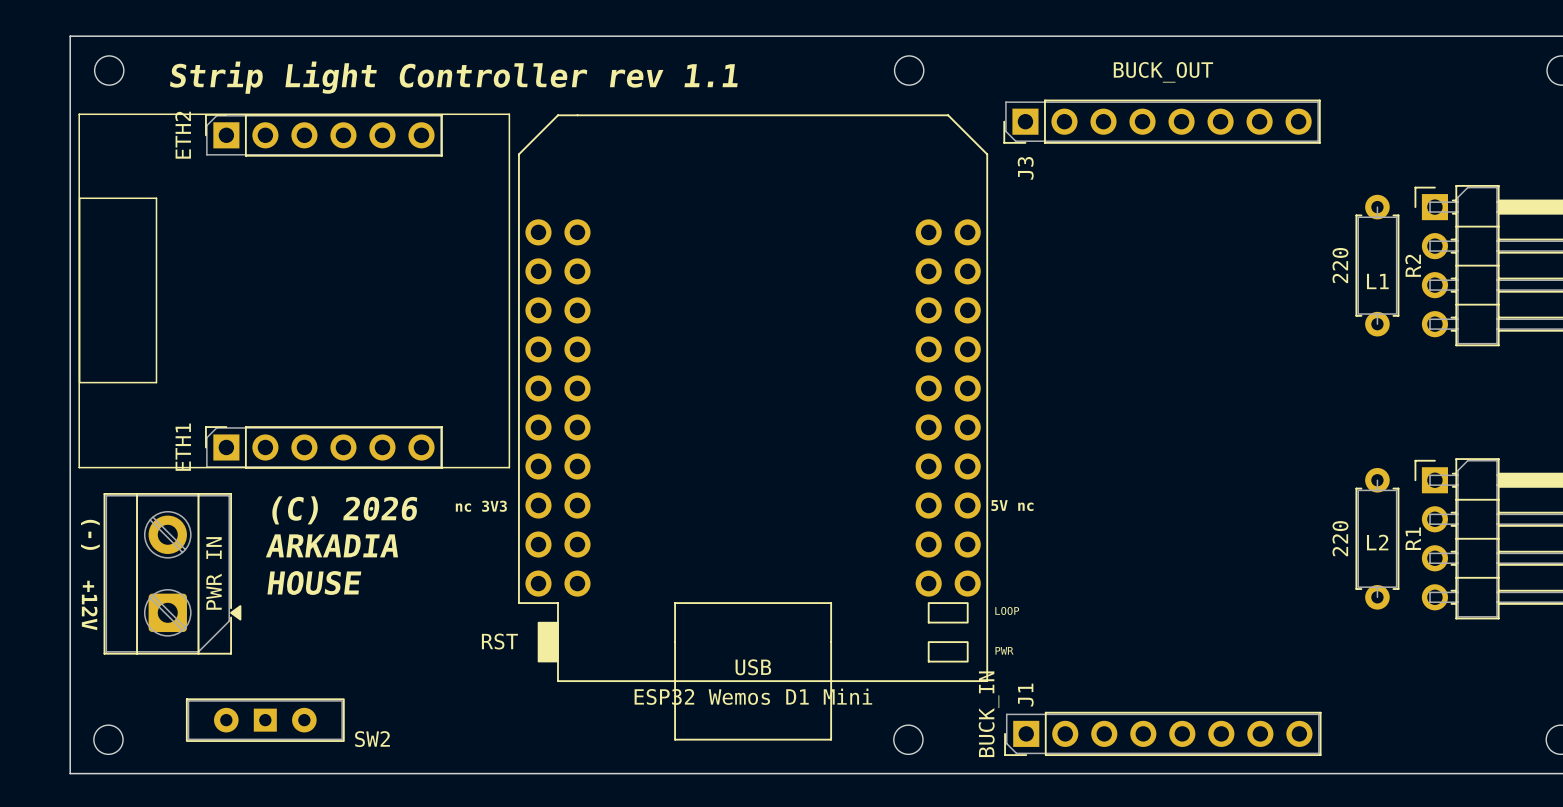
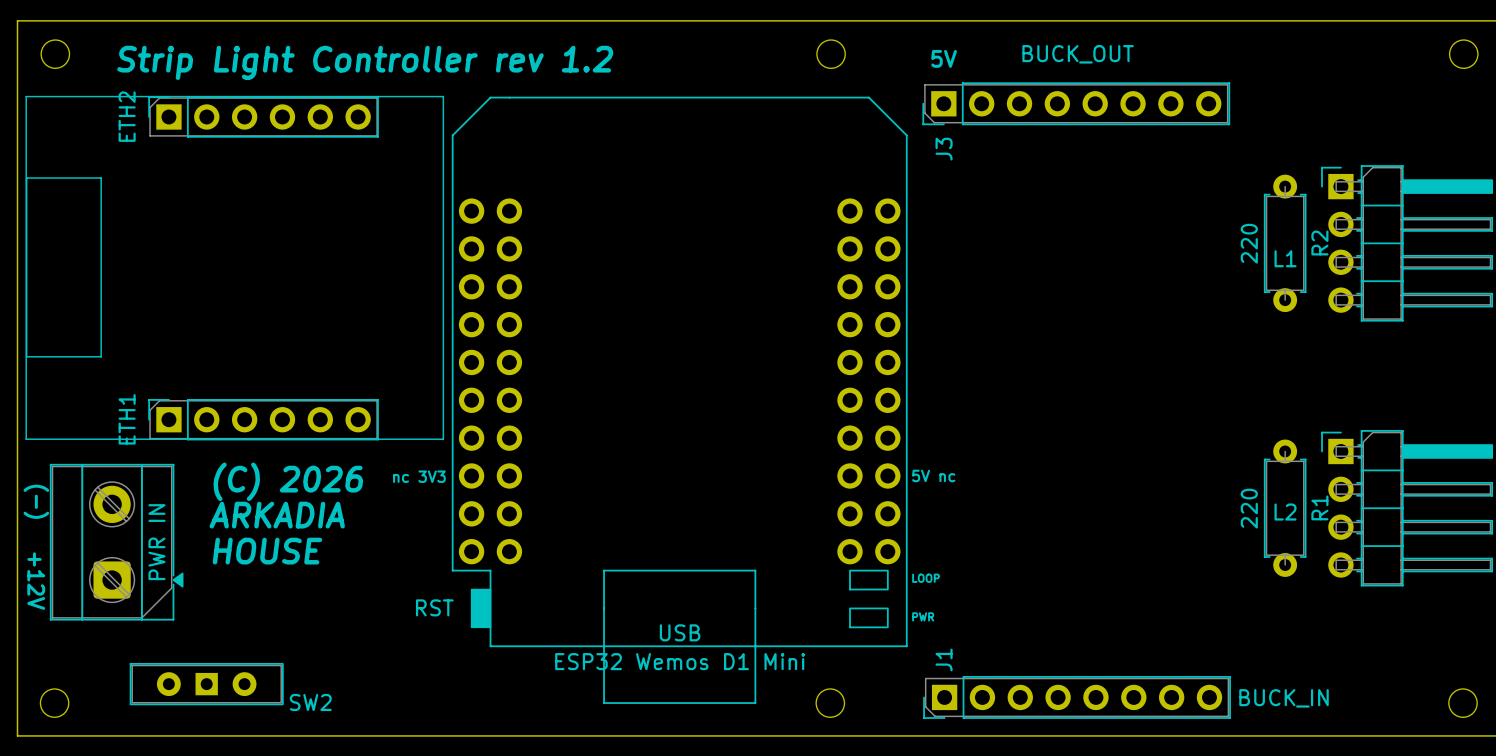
text: none -> 5V (944, 58)
text: Strip Light Controller rev 1.1 (453, 77) -> Strip Light Controller rev 1.2 (365, 62)
J1 value rotation: 0° (988, 714) -> 90° clockwise (1284, 698)
J1 value position: BUCK_IN (988, 714) -> BUCK_IN (1284, 698)

